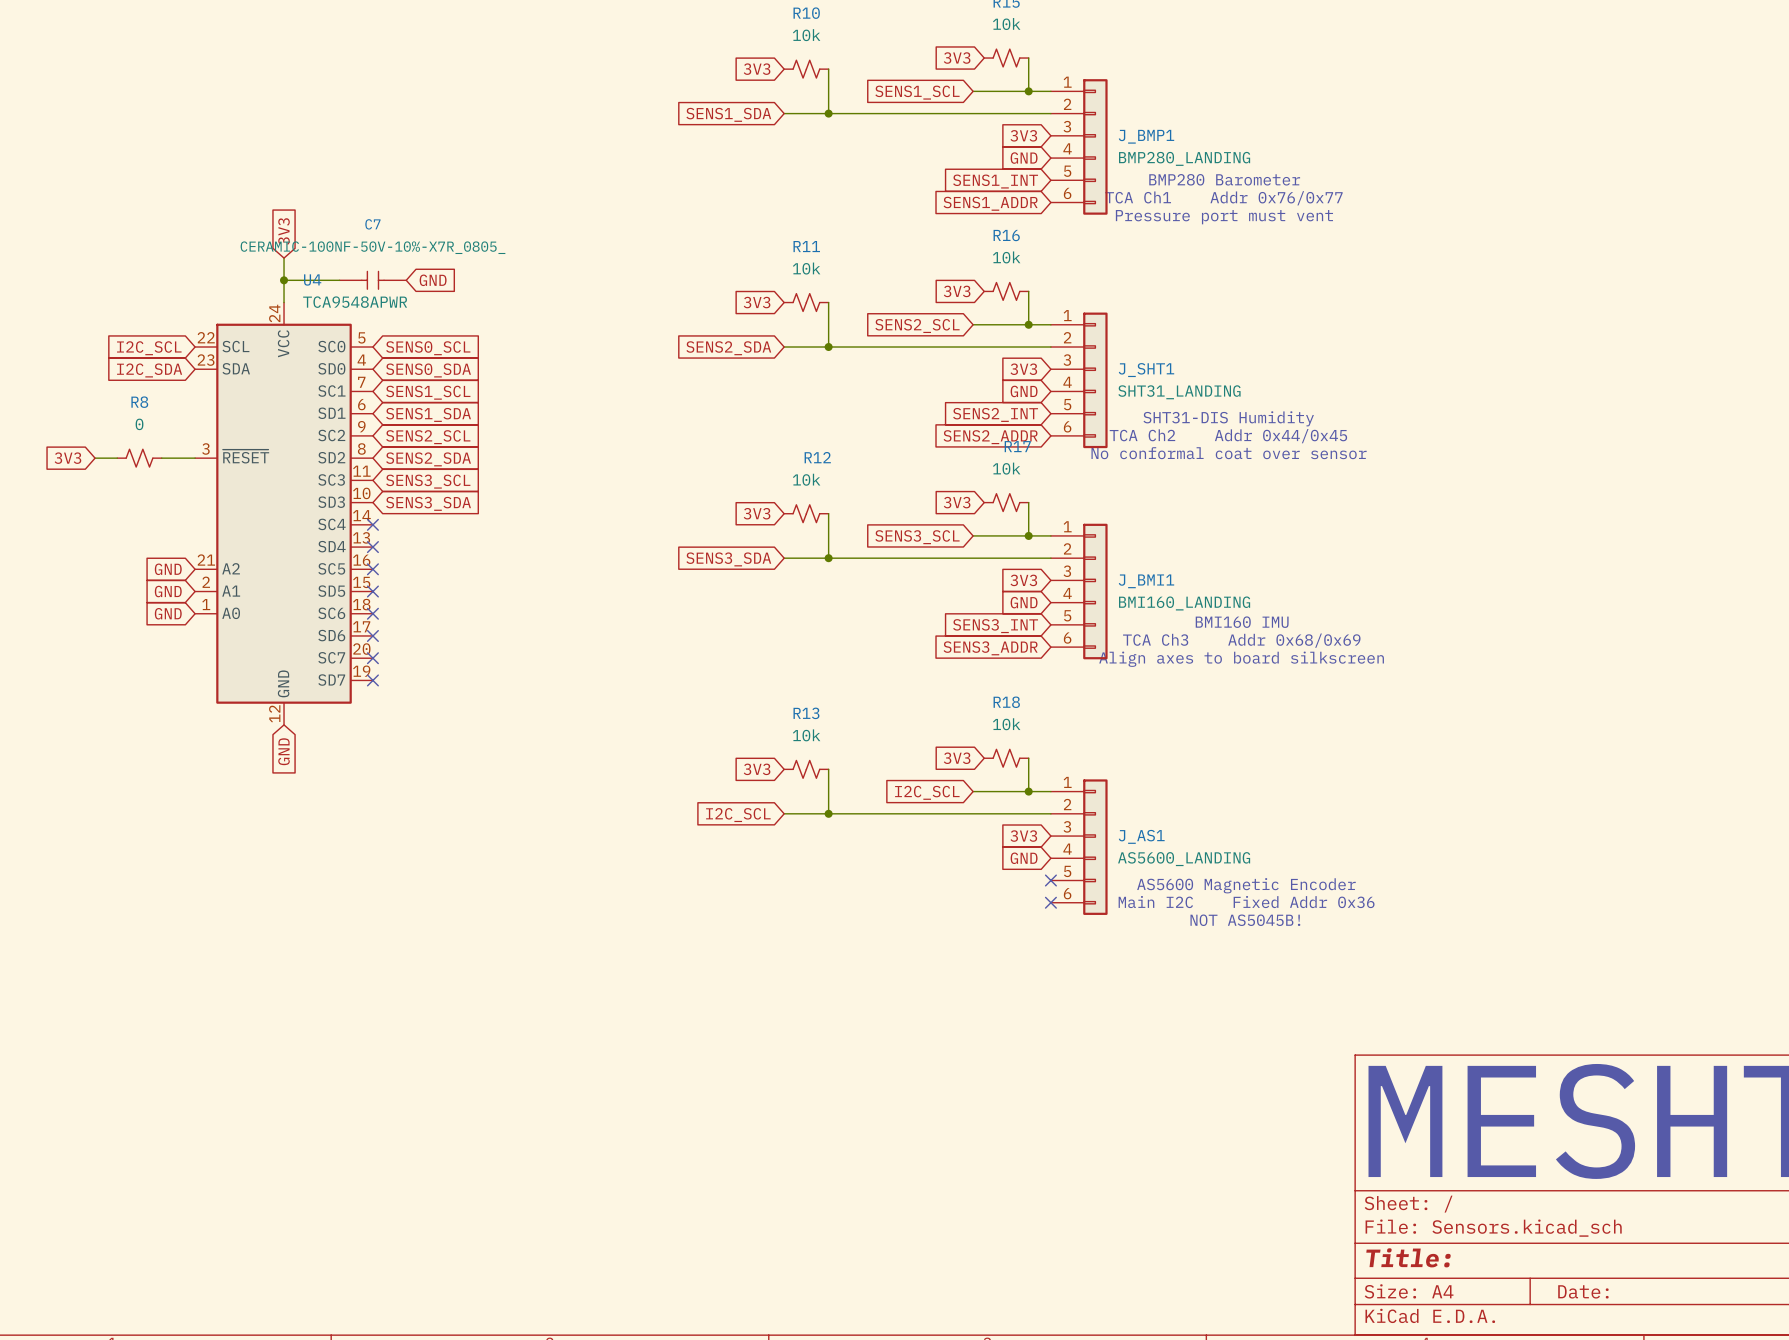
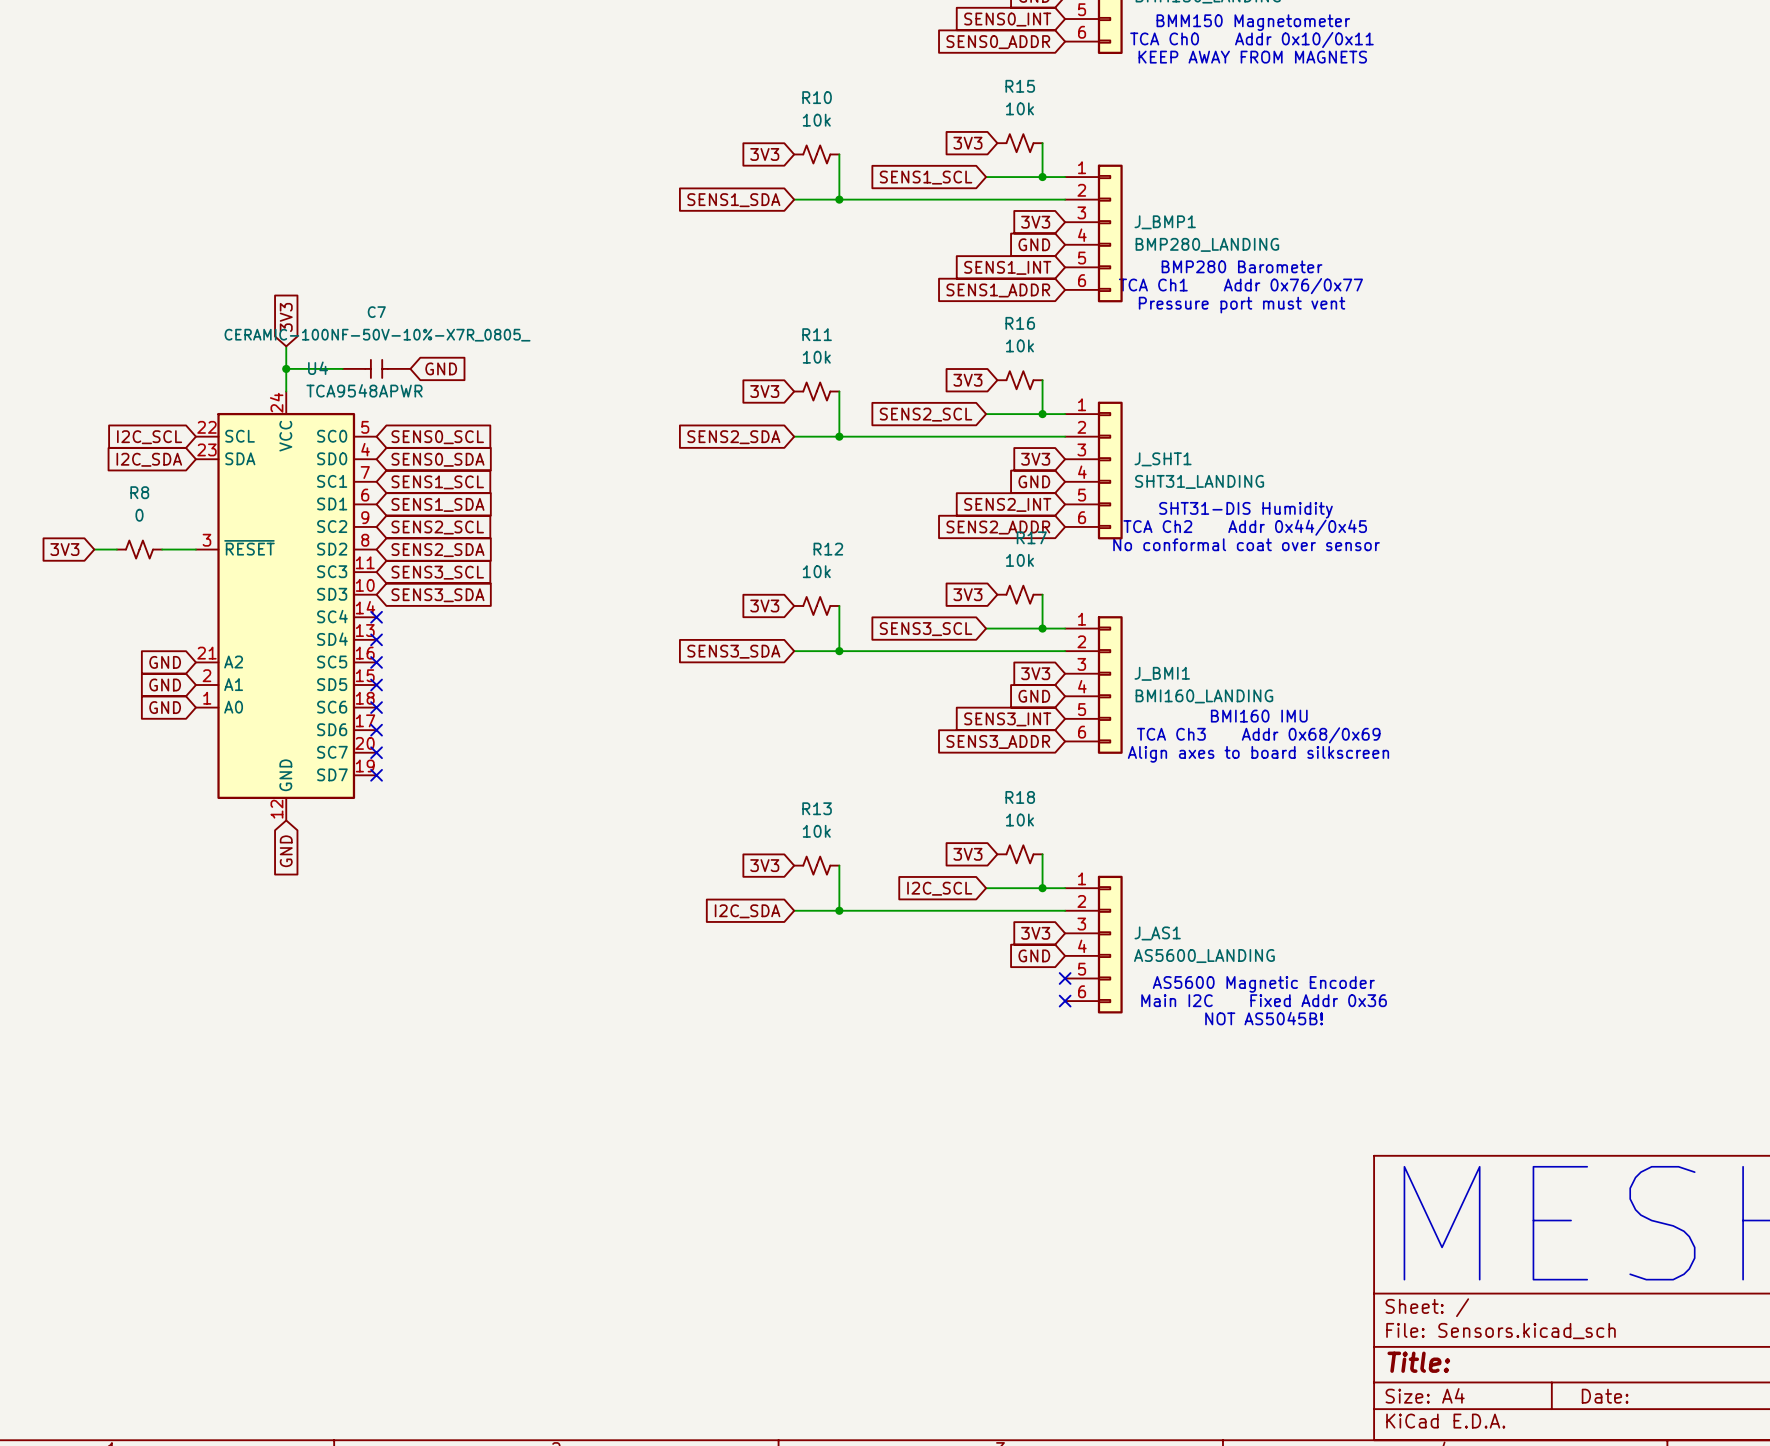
global label: I2C_SCL (738, 815) -> I2C_SDA (747, 911)

